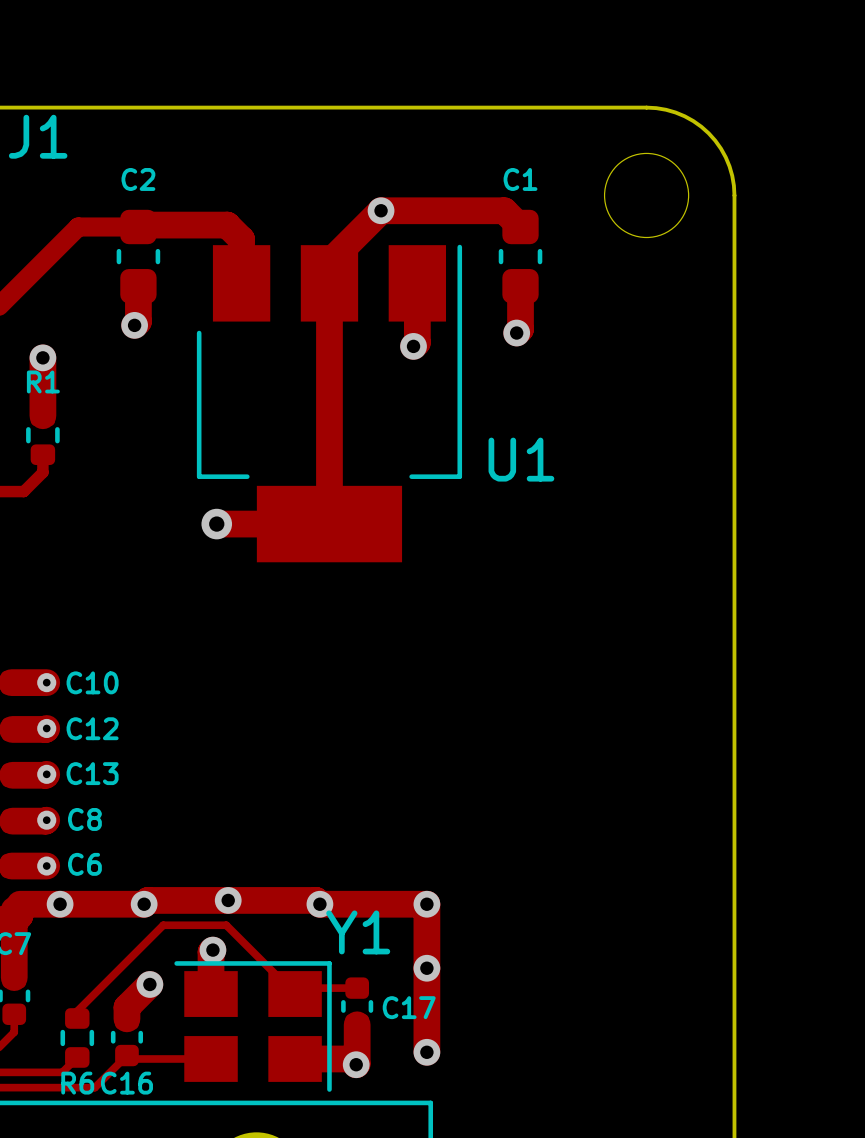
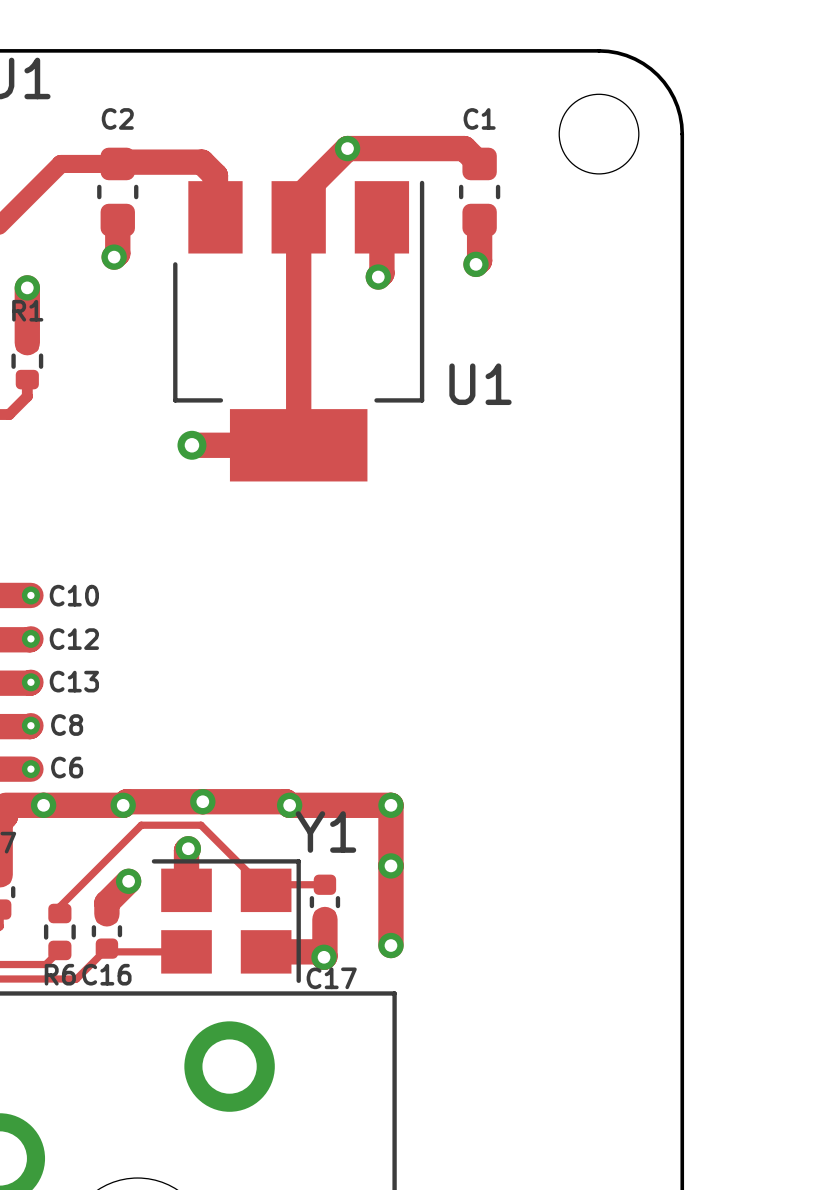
C17 name position: C17 (409, 1007) -> C17 (331, 978)

